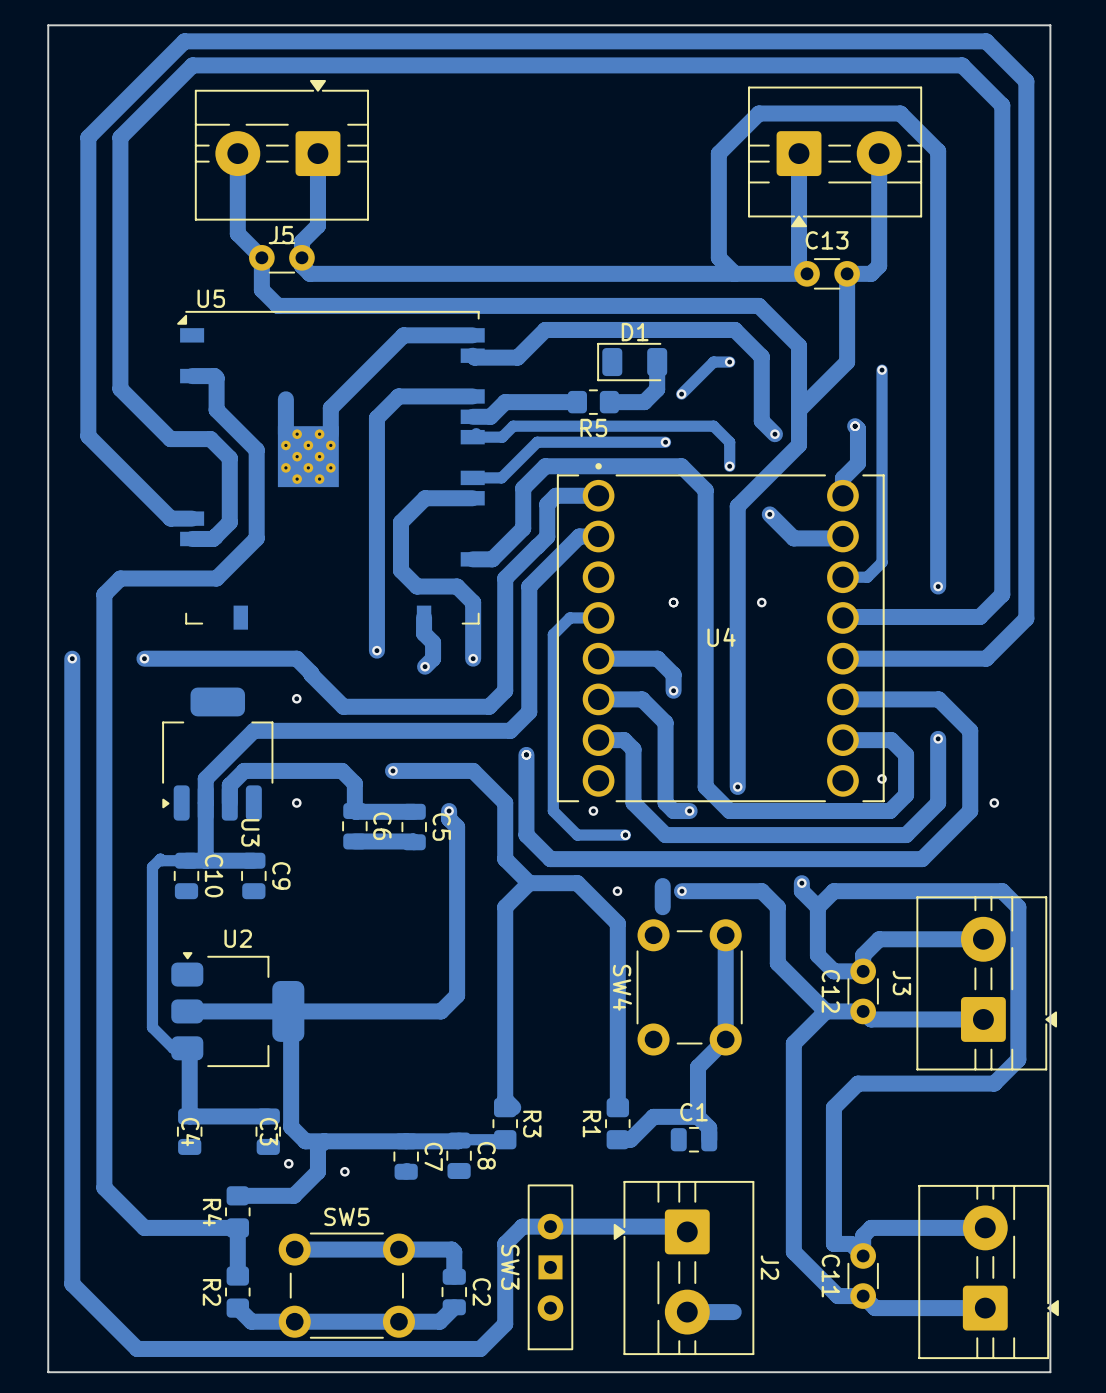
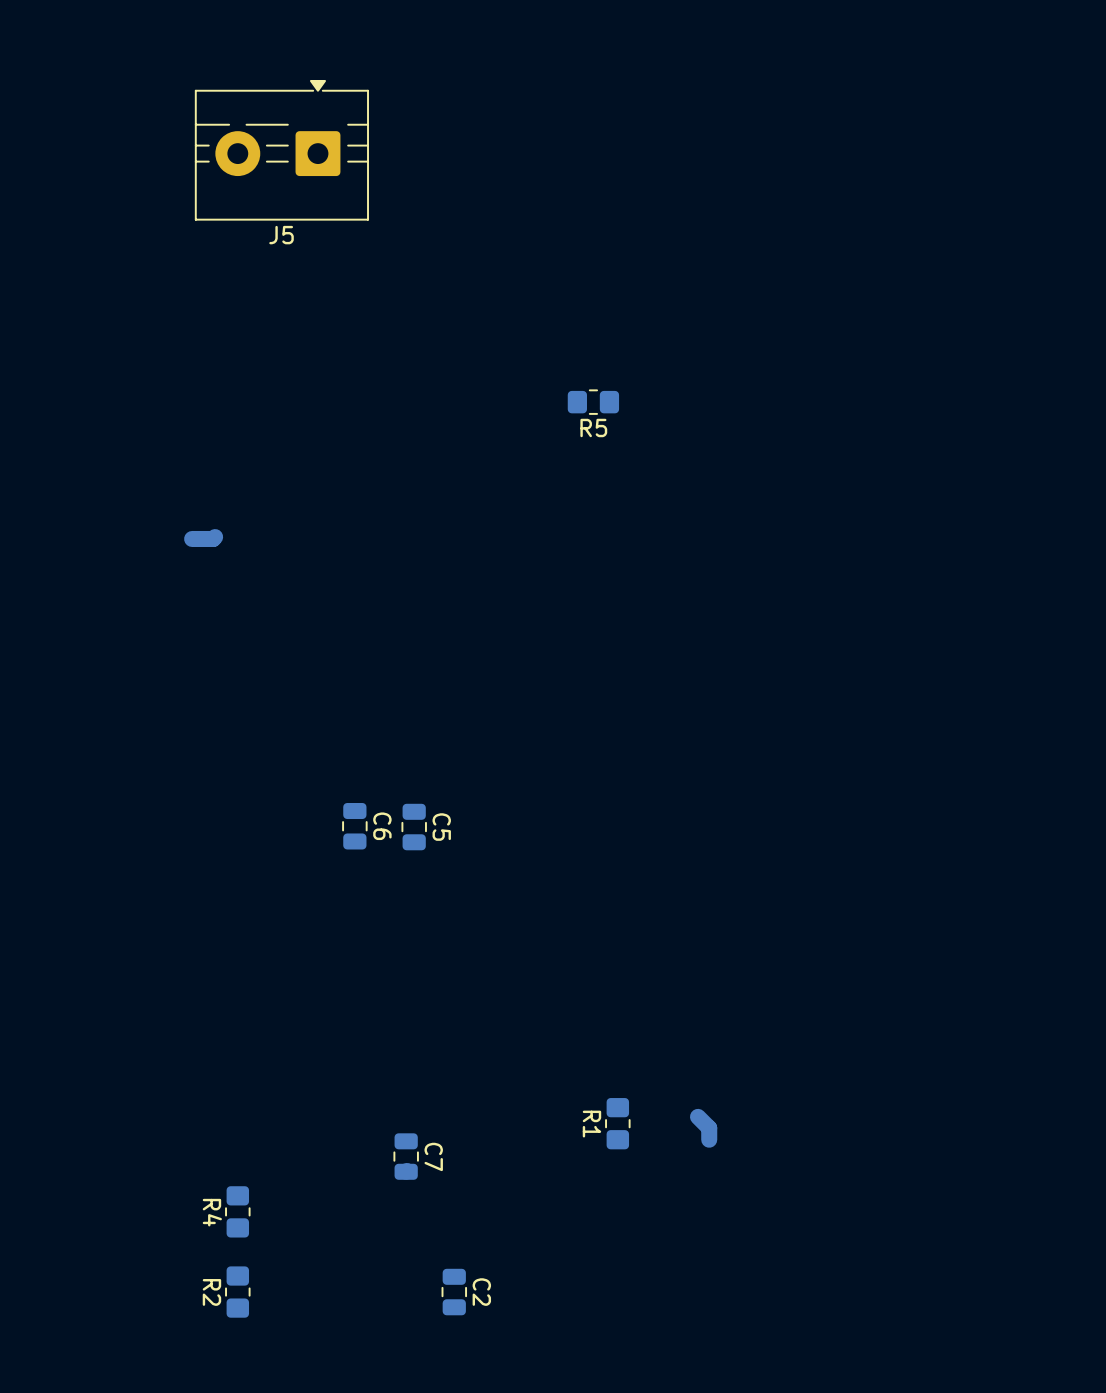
board edge: (1050, 25) (48, 25) (48, 1372) (1050, 1372) (1050, 25) -> none
track: (237, 153) (237, 233) (261, 257) (261, 289) (277, 305) (758, 305) (799, 346) (799, 445) (737, 506) (737, 786) -> none
track: (799, 153) (799, 265) (807, 273) (309, 273) (301, 265) (301, 241) (317, 225) (317, 153) -> none
track: (879, 153) (879, 265) (871, 273) (847, 273) (847, 362) (799, 410) -> none
part: (835, 156) -> none
part: (281, 257) -> none
track: (734, 273) (718, 257) (718, 153) (758, 113) (900, 113) (938, 151) (938, 586) -> none
C13: (827, 273) -> none
track: (472, 335) (403, 335) (330, 408) (330, 434) -> none
track: (472, 355) (474, 357) (517, 357) (545, 329) (734, 329) (761, 356) (761, 421) (774, 434) -> none
D1: (632, 362) -> none
track: (657, 362) (657, 389) (644, 402) (609, 402) -> none
track: (729, 362) (713, 362) (681, 394) -> none
via: (729, 362) -> none
track: (882, 370) (882, 562) (867, 577) (842, 577) -> none
via: (882, 370) -> none
track: (192, 376) (214, 376) (216, 378) (216, 409) (256, 450) (256, 538) (216, 578) (120, 578) (104, 594) (104, 1187) (144, 1227) (237, 1227) (237, 1276) -> none
via: (681, 394) -> none
track: (472, 396) (398, 396) (376, 418) (376, 650) -> none
track: (285, 399) (285, 434) -> none
track: (577, 402) (505, 402) (490, 416) (472, 416) (474, 419) -> none
track: (855, 426) (857, 429) (857, 463) (842, 478) (842, 495) -> none
via: (855, 426) -> none
track: (476, 433) (472, 437) (502, 437) (513, 426) (713, 426) (729, 442) (729, 466) -> none
via: (774, 434) -> none
track: (665, 442) (537, 442) (501, 477) (472, 477) -> none
via: (665, 442) -> none
via: (729, 466) -> none
U5: (330, 470) -> none
track: (598, 495) (555, 495) (547, 504) (547, 536) (505, 578) (505, 690) (489, 706) (343, 706) (296, 658) (144, 658) -> none
track: (472, 498) (425, 498) (401, 522) (401, 570) (417, 586) (457, 586) (473, 602) (473, 658) -> none
track: (769, 514) (793, 538) (841, 538) (842, 536) -> none
via: (769, 514) -> none
track: (192, 518) (170, 518) (88, 436) (88, 137) (184, 41) (986, 41) (1026, 81) (1026, 618) (986, 658) (842, 658) -> none
track: (215, 536) (229, 522) (229, 458) (210, 439) (170, 439) (120, 388) (120, 137) (192, 65) (962, 65) (1002, 105) (1002, 594) (979, 616) (842, 617) -> none
track: (598, 536) (579, 536) (529, 586) (529, 711) (510, 730) (253, 730) (205, 778) (205, 860) -> none
track: (472, 559) (492, 559) (523, 528) (523, 488) (545, 466) (681, 466) (705, 490) (705, 786) (729, 811) (890, 811) (906, 794) (906, 754) (891, 740) (842, 740) -> none
via: (938, 586) -> none
via: (673, 602) -> none
via: (761, 602) -> none
track: (424, 617) (424, 633) (433, 642) (433, 658) (425, 666) -> none
track: (598, 617) (570, 617) (553, 634) (553, 811) (577, 835) (625, 835) -> none
U4: (720, 632) -> none
via: (376, 650) -> none
track: (72, 658) (72, 1284) (137, 1348) (480, 1348) (505, 1324) (505, 1243) (522, 1226) (682, 1226) (687, 1231) -> none
via: (72, 658) -> none
via: (144, 658) -> none
via: (473, 658) -> none
track: (598, 658) (657, 658) (673, 674) (673, 690) -> none
via: (425, 666) -> none
via: (673, 690) -> none
via: (296, 698) -> none
track: (598, 699) (642, 699) (665, 722) (665, 802) (673, 811) (689, 811) -> none
track: (842, 699) (938, 699) (970, 730) (970, 811) (922, 859) (550, 859) (526, 835) (526, 754) -> none
track: (938, 738) (938, 802) (906, 835) (665, 835) (633, 802) (633, 749) (624, 740) (598, 740) -> none
via: (938, 738) -> none
U3: (217, 754) -> none
via: (526, 754) -> none
track: (392, 770) (473, 770) (505, 802) (505, 859) (529, 883) -> none
via: (392, 770) -> none
via: (882, 778) -> none
via: (737, 786) -> none
track: (229, 802) (229, 785) (244, 770) (342, 770) (354, 783) (355, 811) (414, 811) -> none
via: (296, 802) -> none
via: (994, 802) -> none
track: (449, 811) (449, 819) (457, 827) (457, 995) (441, 1011) (187, 1011) -> none
via: (449, 811) -> none
via: (593, 811) -> none
via: (689, 811) -> none
via: (625, 835) -> none
track: (354, 841) (414, 842) -> none
track: (253, 860) (162, 860) (160, 859) (152, 867) (152, 1027) (173, 1048) (187, 1048) (189, 1050) (189, 1116) (268, 1116) -> none
C10: (186, 875) -> none
C9: (253, 875) -> none
track: (529, 883) (577, 883) (617, 923) (617, 1107) -> none
track: (529, 883) (505, 907) (505, 1099) (513, 1107) -> none
track: (801, 883) (801, 891) (817, 907) -> none
via: (801, 883) -> none
track: (662, 886) (662, 907) -> none
via: (617, 891) -> none
track: (681, 891) (761, 891) (777, 907) (777, 963) (825, 1011) -> none
via: (681, 891) -> none
track: (817, 907) (817, 955) (833, 971) (863, 971) (863, 955) (879, 939) (983, 939) -> none
track: (817, 907) (833, 891) (1002, 891) (1018, 907) (1018, 1059) (994, 1083) (857, 1083) (833, 1107) (833, 1243) (851, 1243) (863, 1255) (863, 1235) (871, 1227) (985, 1227) -> none
track: (725, 935) (725, 1039) (698, 1067) (698, 1116) (653, 1116) (630, 1139) (617, 1139) -> none
J3: (986, 983) -> none
SW4: (689, 987) -> none
C12: (863, 991) -> none
U2: (237, 1009) -> none
track: (288, 1011) (291, 1014) (291, 1126) (305, 1141) (505, 1139) -> none
track: (825, 1011) (793, 1043) (793, 1251) (837, 1296) (863, 1296) (875, 1308) (985, 1308) (977, 1316) -> none
track: (825, 1011) (863, 1011) (871, 1019) (983, 1019) -> none
R3: (505, 1123) -> none
C4: (189, 1131) -> none
C3: (268, 1131) -> none
C1: (693, 1139) -> none
track: (324, 1141) (317, 1147) (317, 1171) (293, 1195) (237, 1195) -> none
C8: (459, 1155) -> none
via: (288, 1163) -> none
via: (344, 1171) -> none
track: (294, 1249) (451, 1249) (454, 1251) (454, 1276) -> none
SW3: (550, 1267) -> none
J2: (684, 1267) -> none
part: (988, 1272) -> none
C11: (863, 1276) -> none
SW5: (346, 1285) -> none
track: (454, 1307) (439, 1321) (251, 1321) (237, 1308) -> none
track: (733, 1312) (687, 1312) -> none

